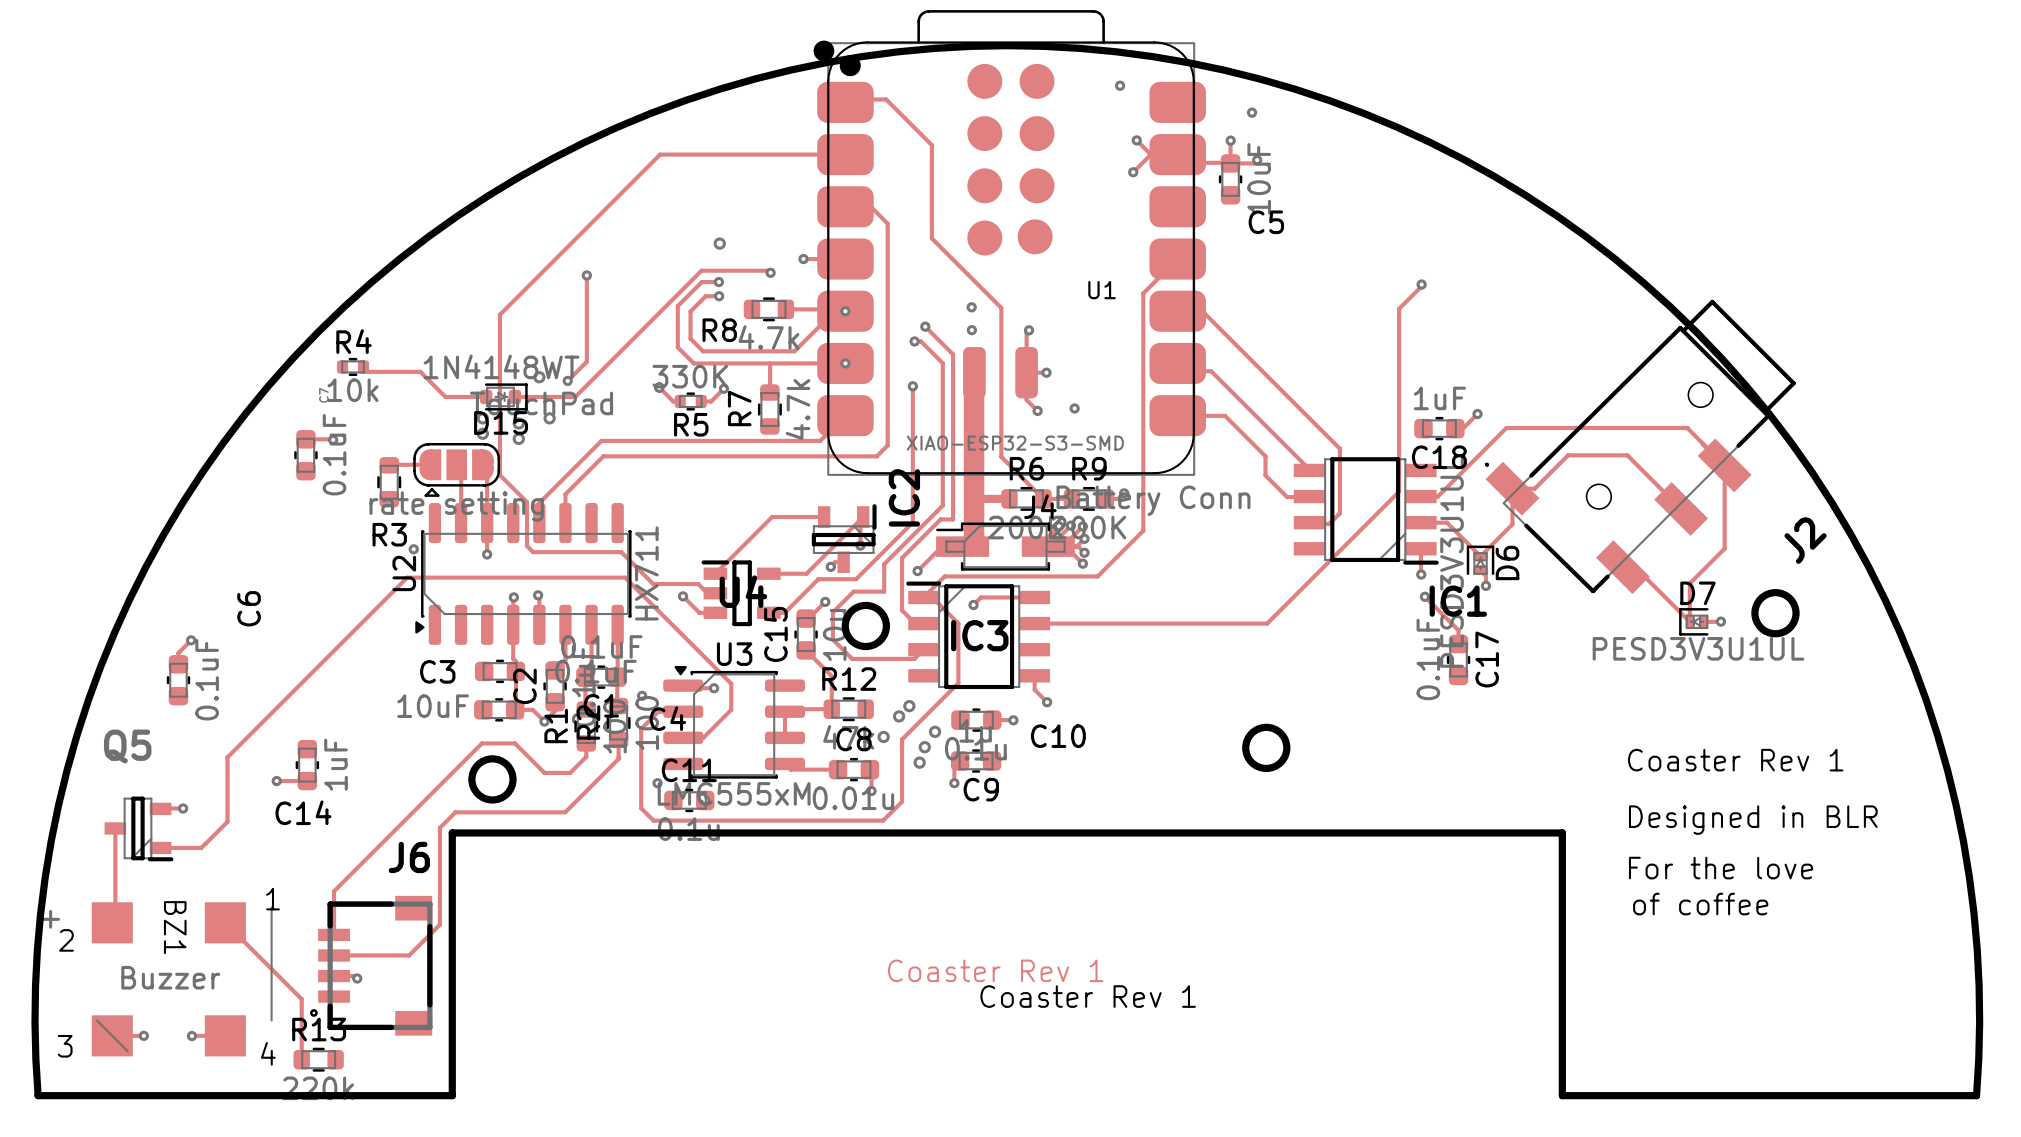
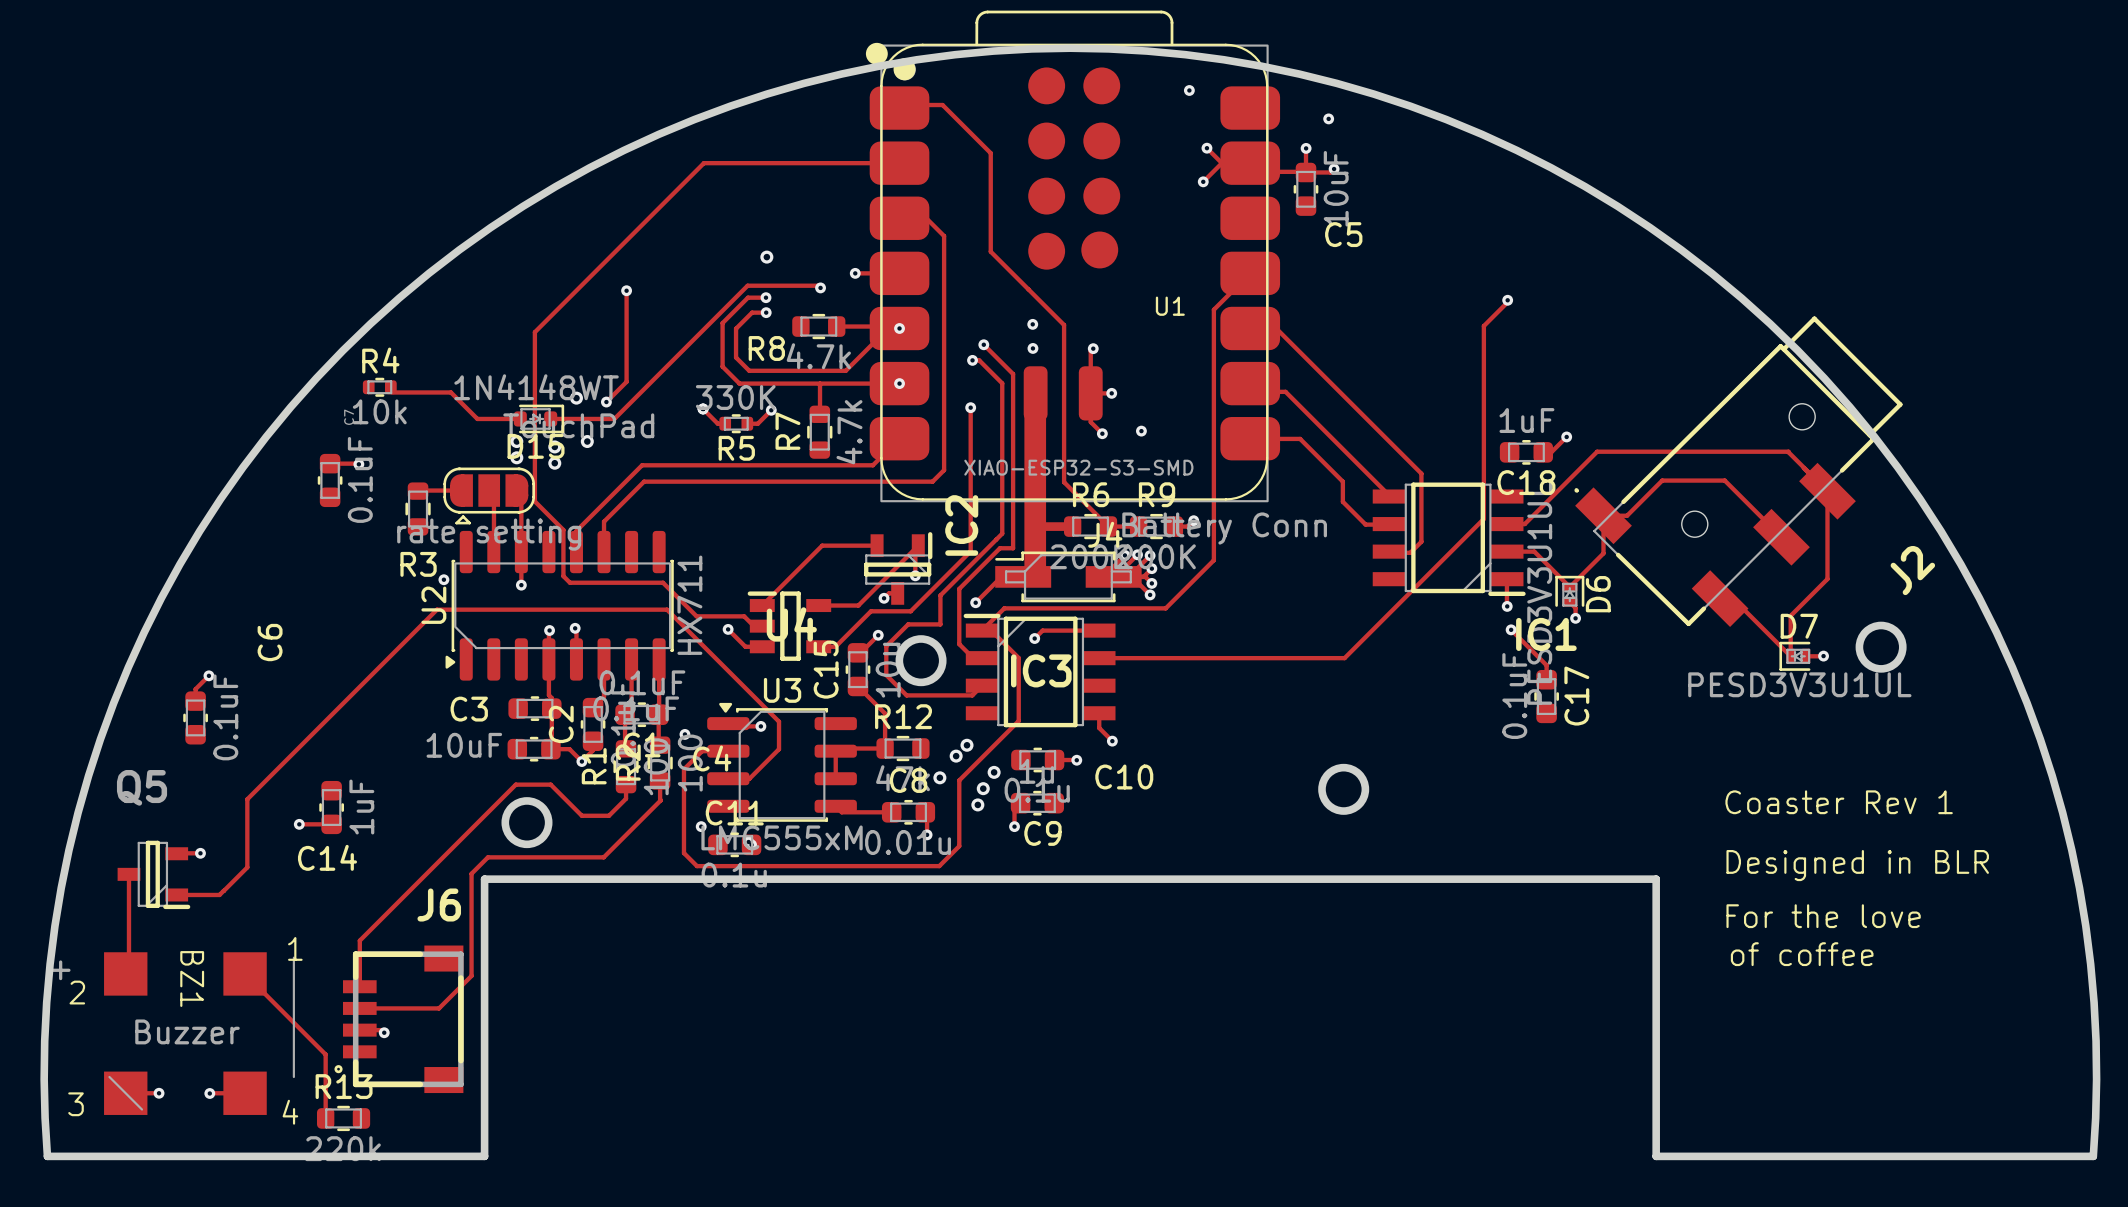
text: Coaster Rev 1 (995, 970) -> none
text: Coaster Rev 1 (1088, 996) -> none

